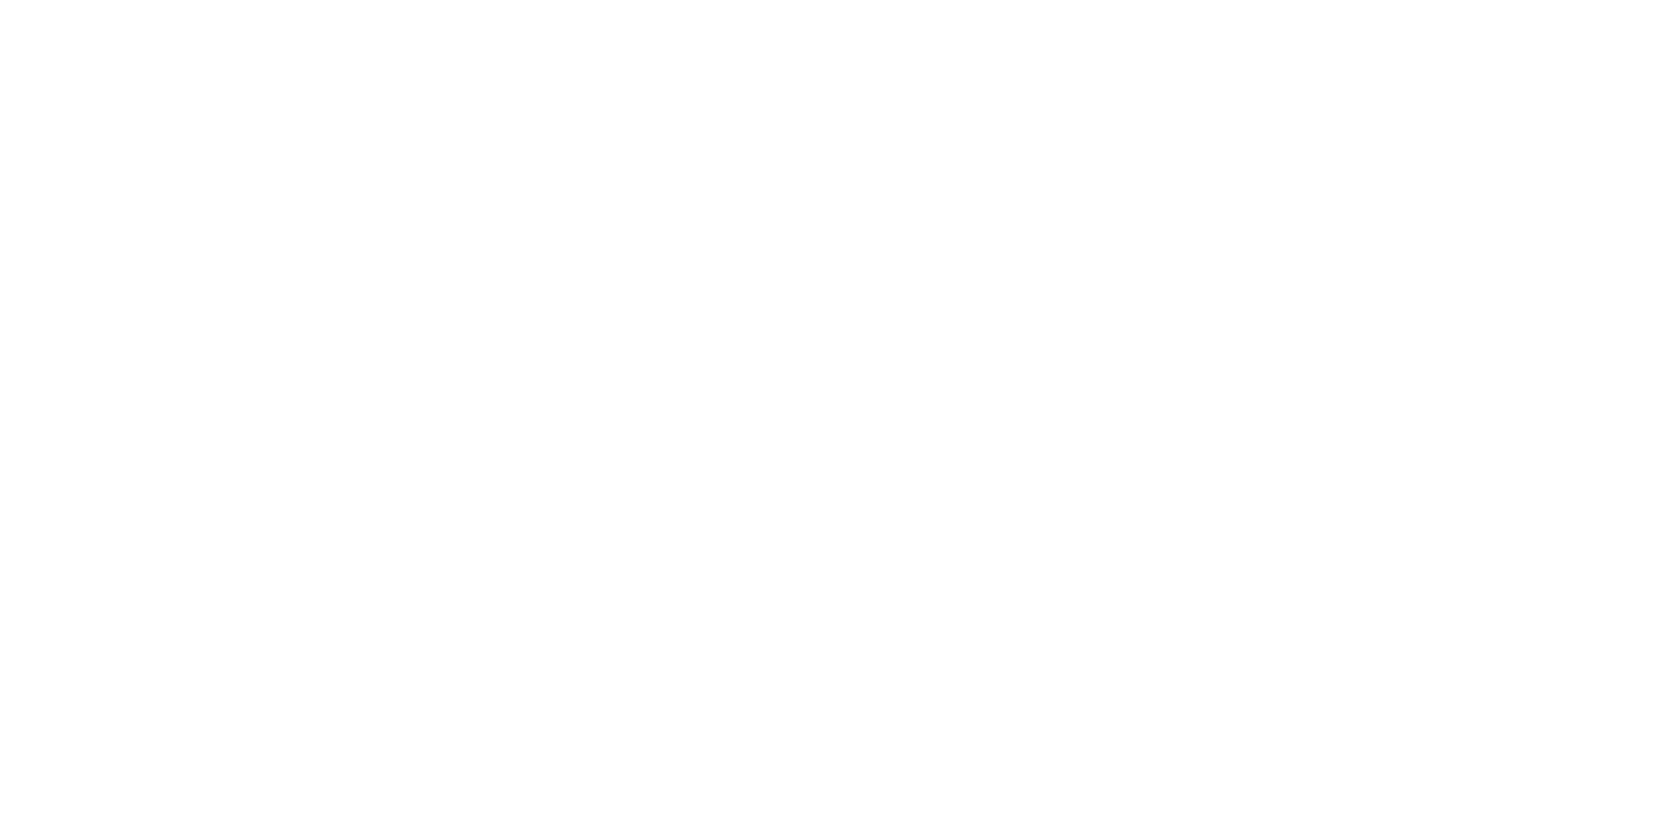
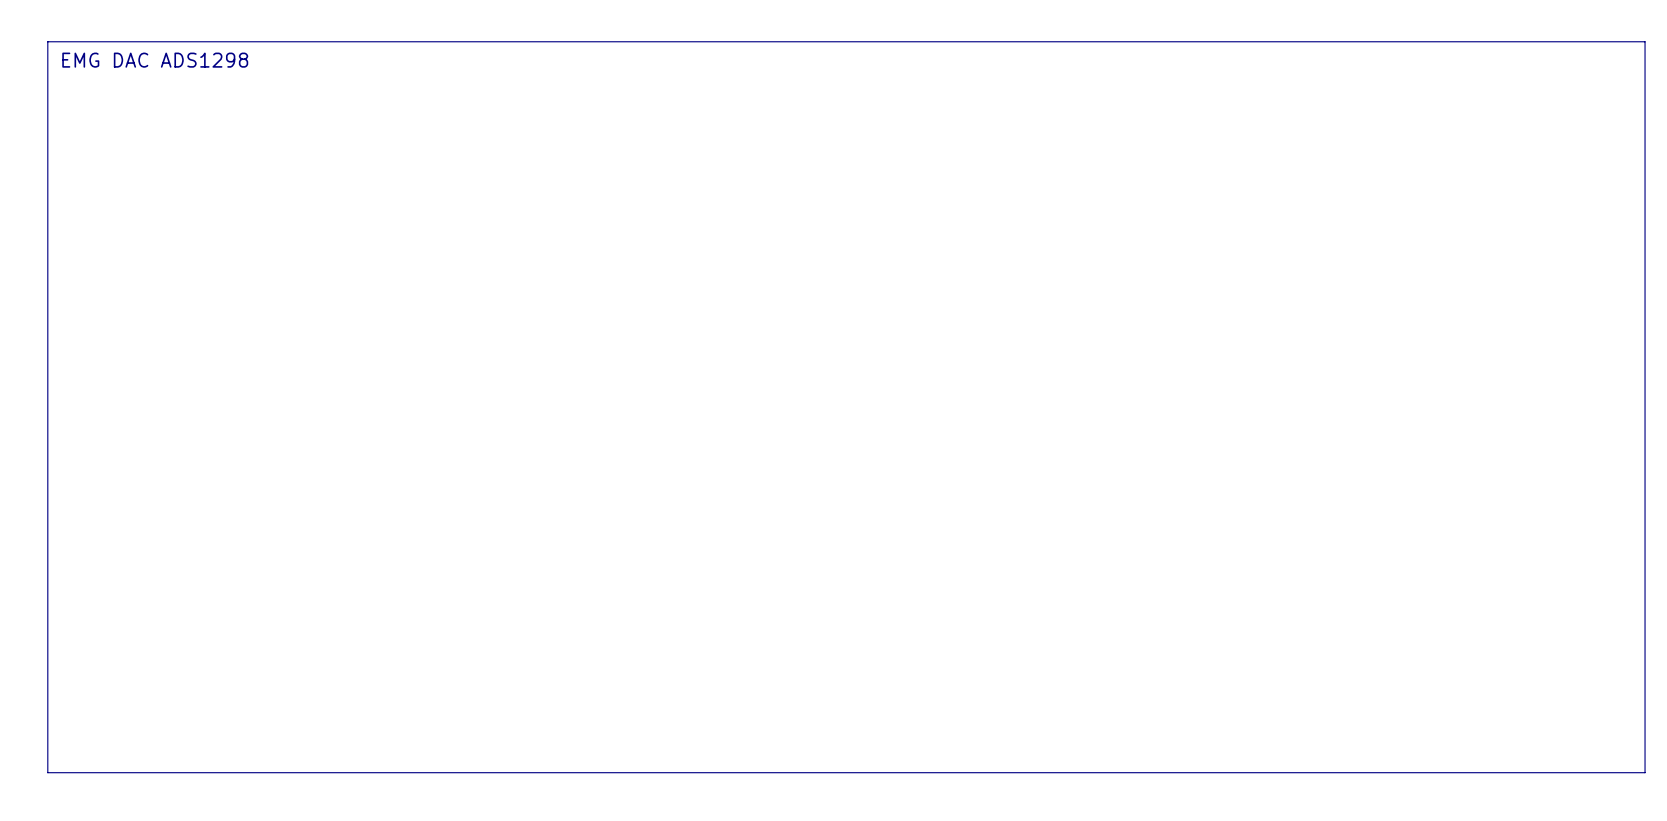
line: none -> (47, 41) (1645, 41) (1645, 772) (47, 772) (47, 41)
text: none -> EMG DAC ADS1298 (155, 60)

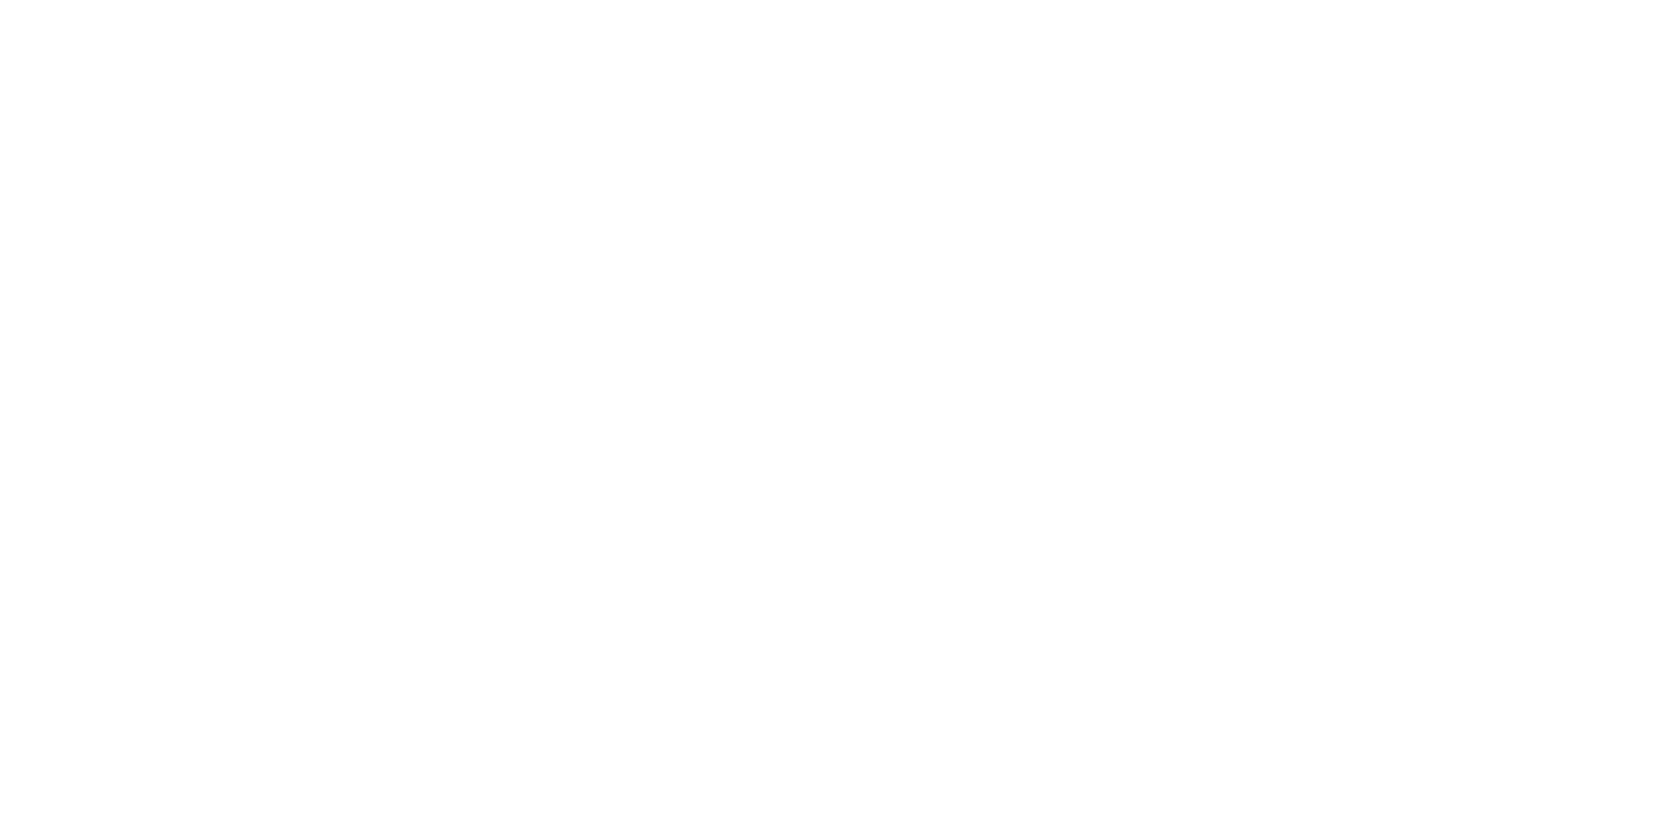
line: (47, 41) (1645, 41) (1645, 772) (47, 772) (47, 41) -> none
text: EMG DAC ADS1298 (155, 60) -> none

